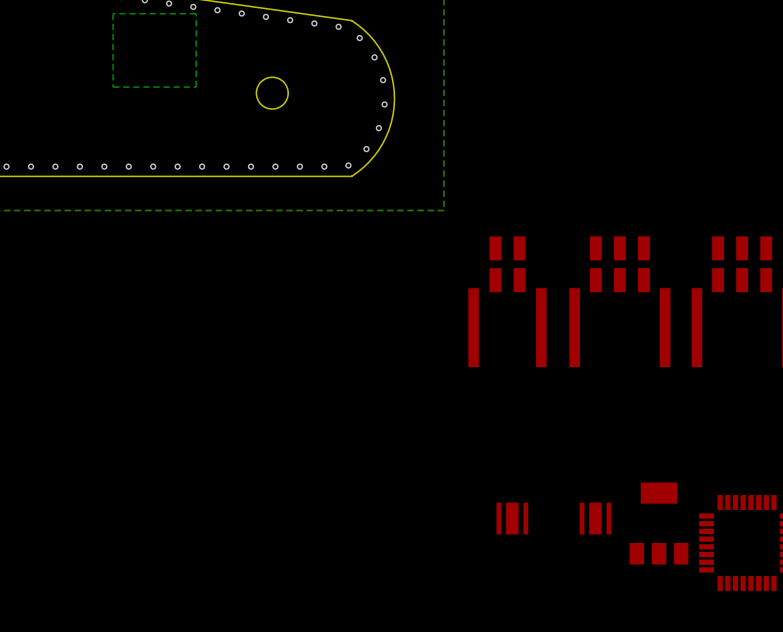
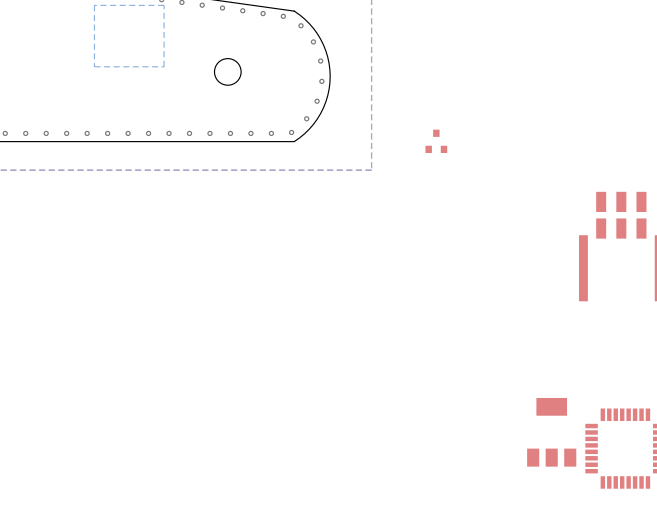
part: none -> (436, 141)
part: (507, 301) -> none
part: (619, 301) -> none
part: (512, 518) -> none
part: (595, 518) -> none

